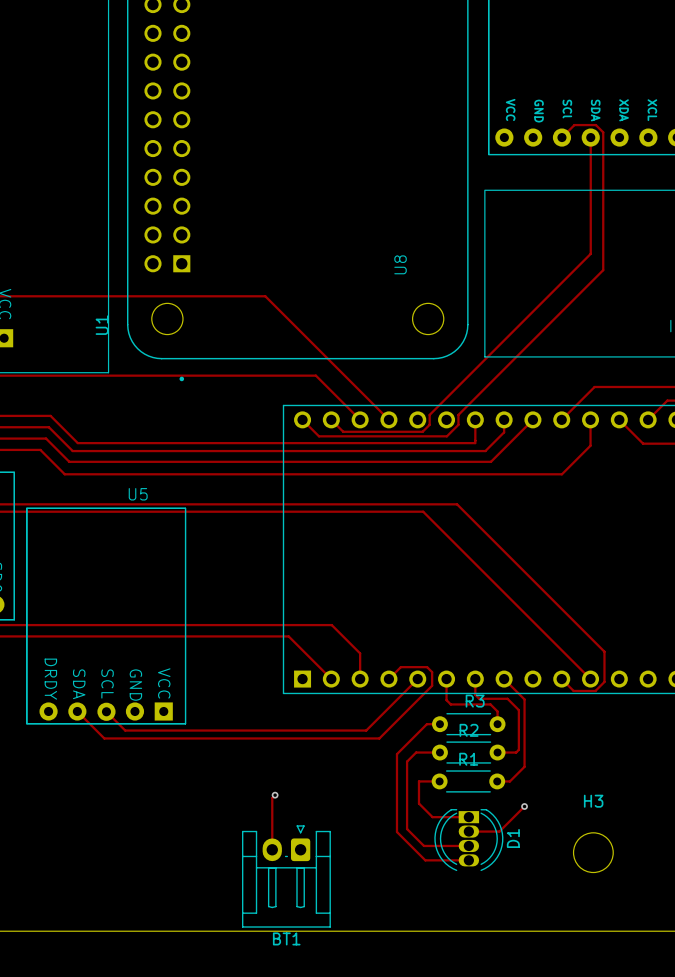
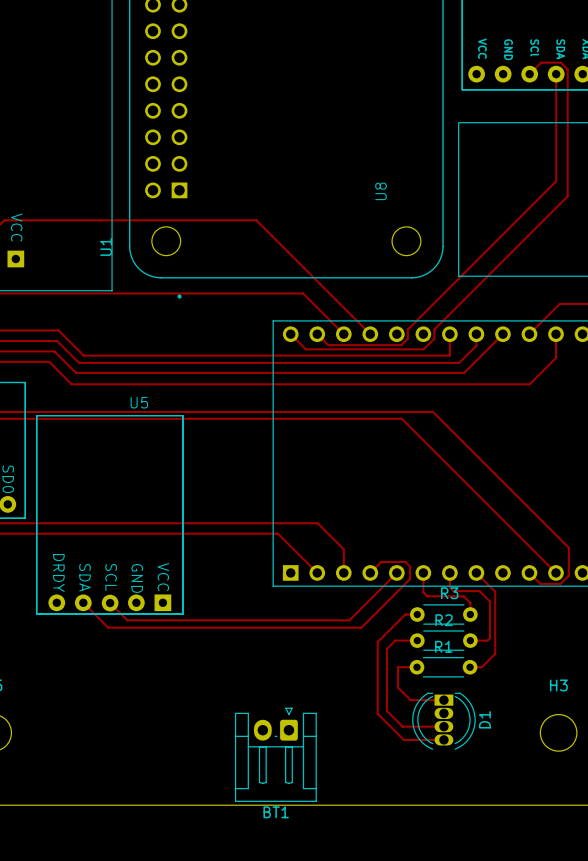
track: (275, 795) (272, 798) (272, 849) -> none
via: (275, 795) -> none
track: (524, 806) (499, 831) (468, 831) -> none
via: (524, 806) -> none

